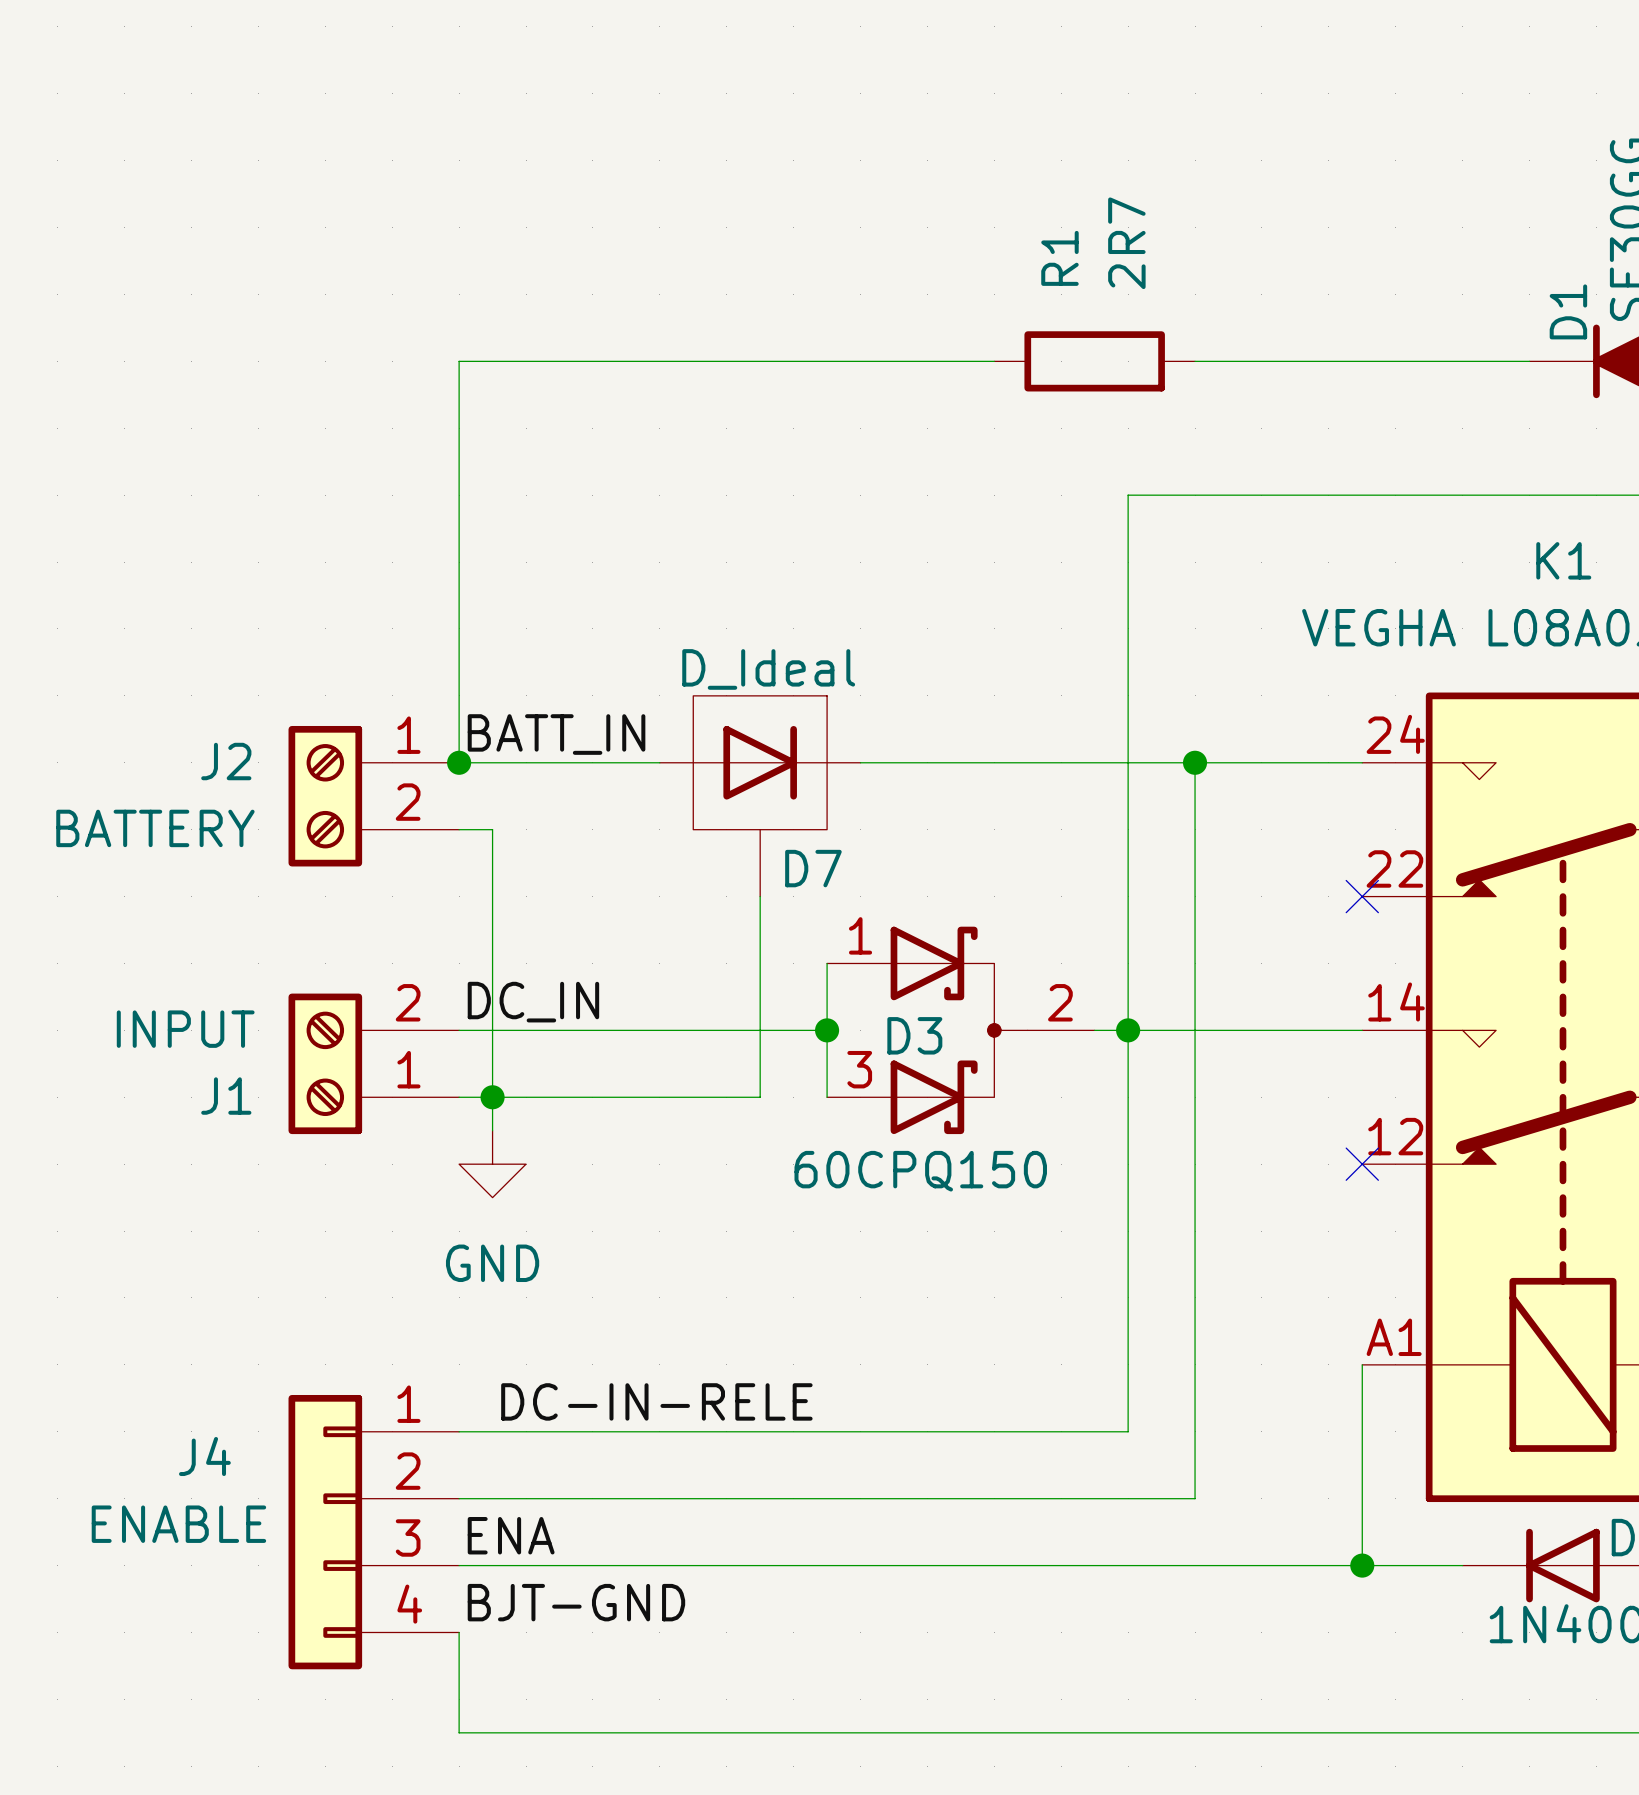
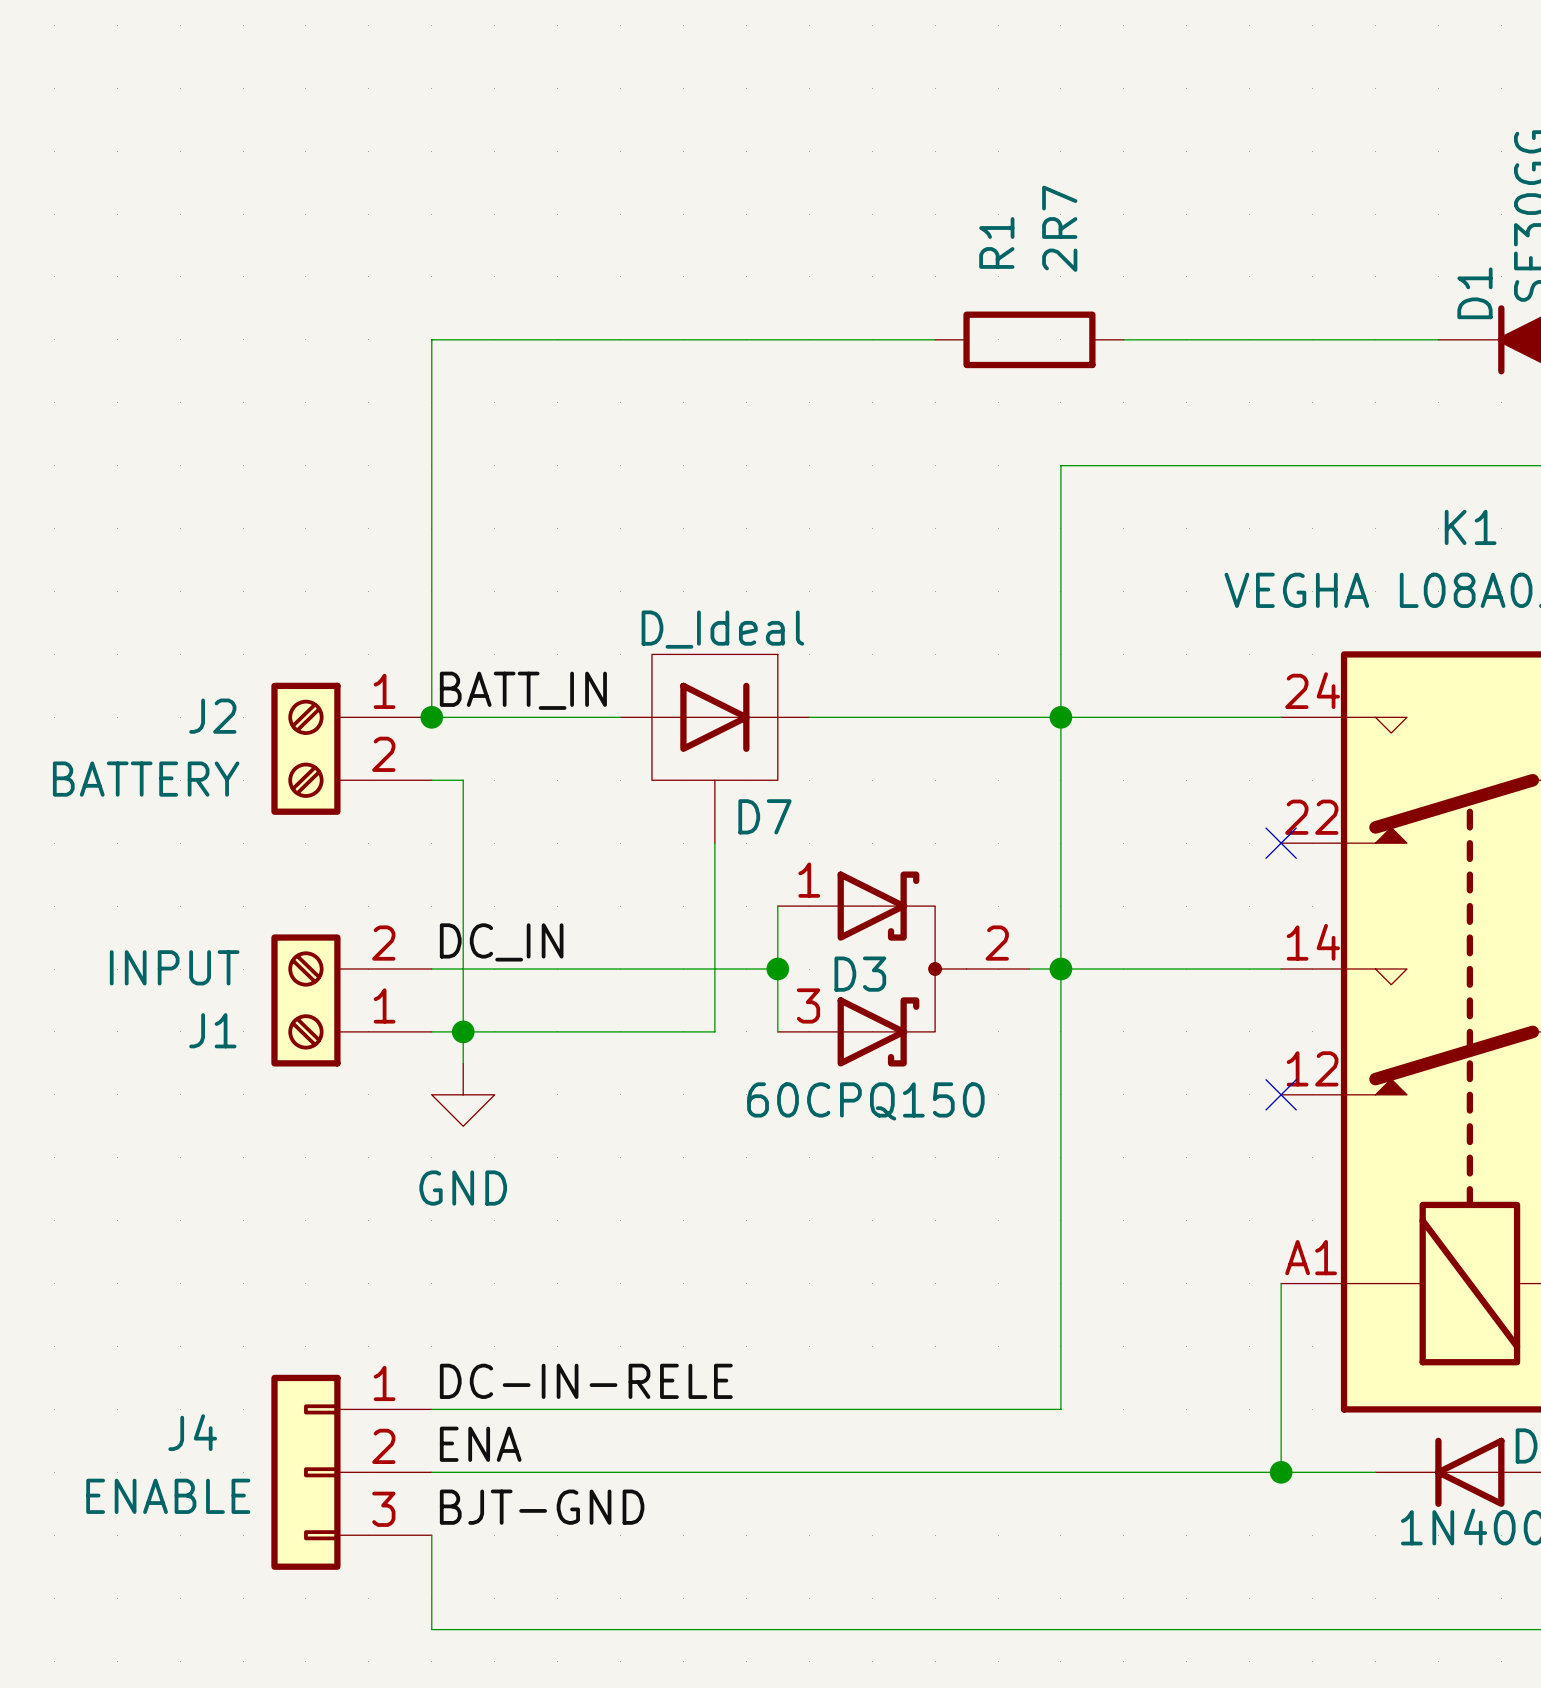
wire: (1195, 762) (1195, 1498) (1128, 1498) -> (1060, 1346) (1060, 1409)
junction position: (1195, 762) -> (1060, 717)
J4 symbol: [288, 1394, 460, 1670] -> [271, 1374, 432, 1570]
label position: DC-IN-RELE (656, 1401) -> DC-IN-RELE (586, 1381)
wire: (459, 1431) (1128, 1431) -> none

